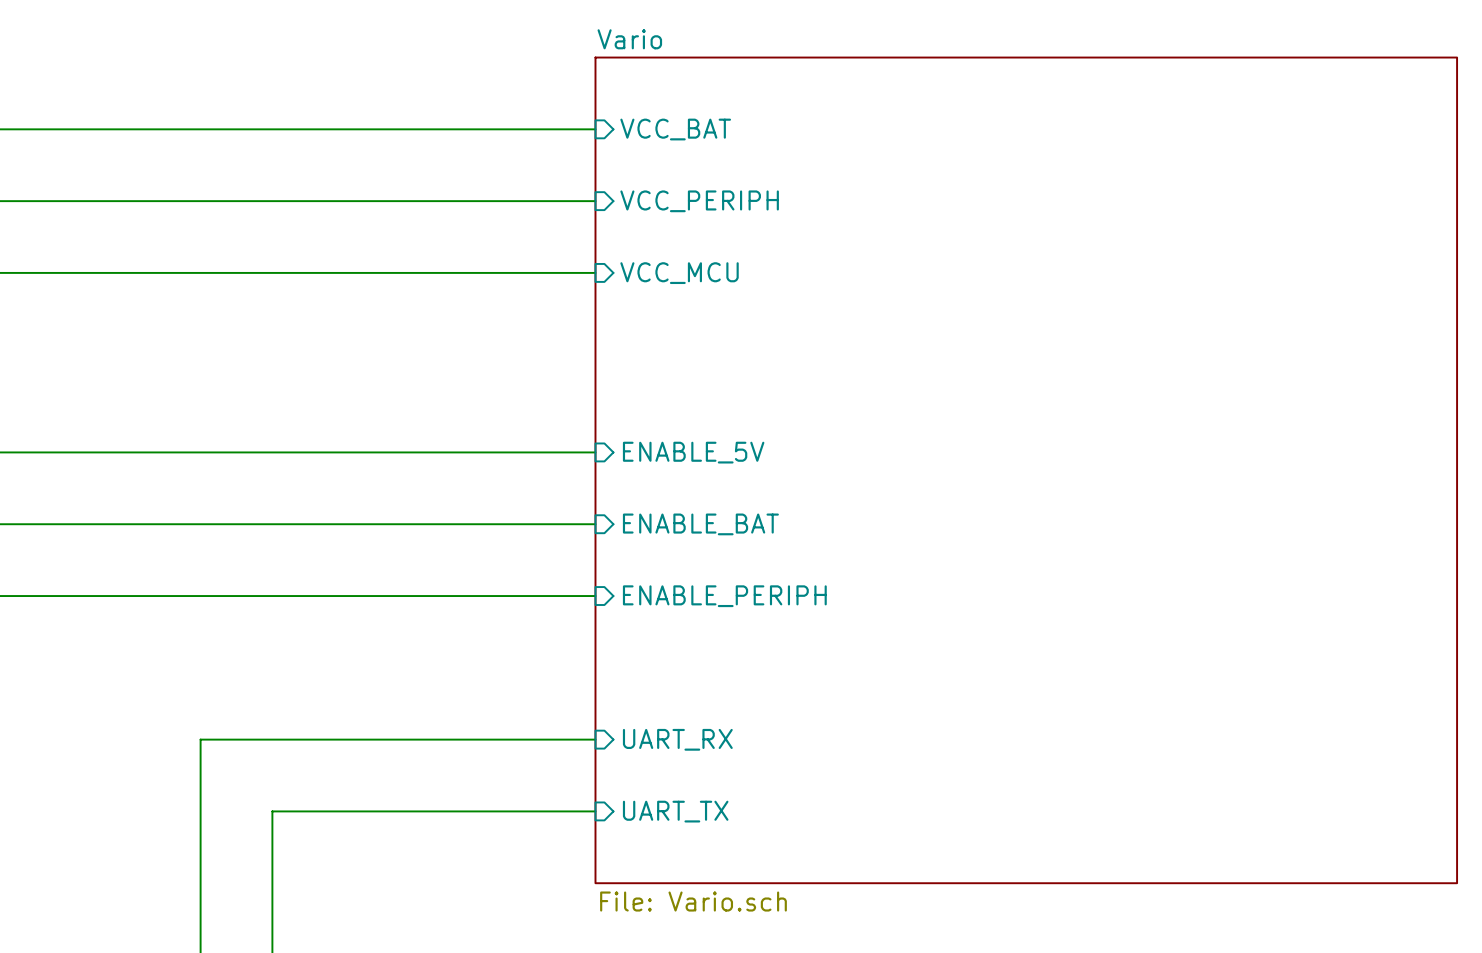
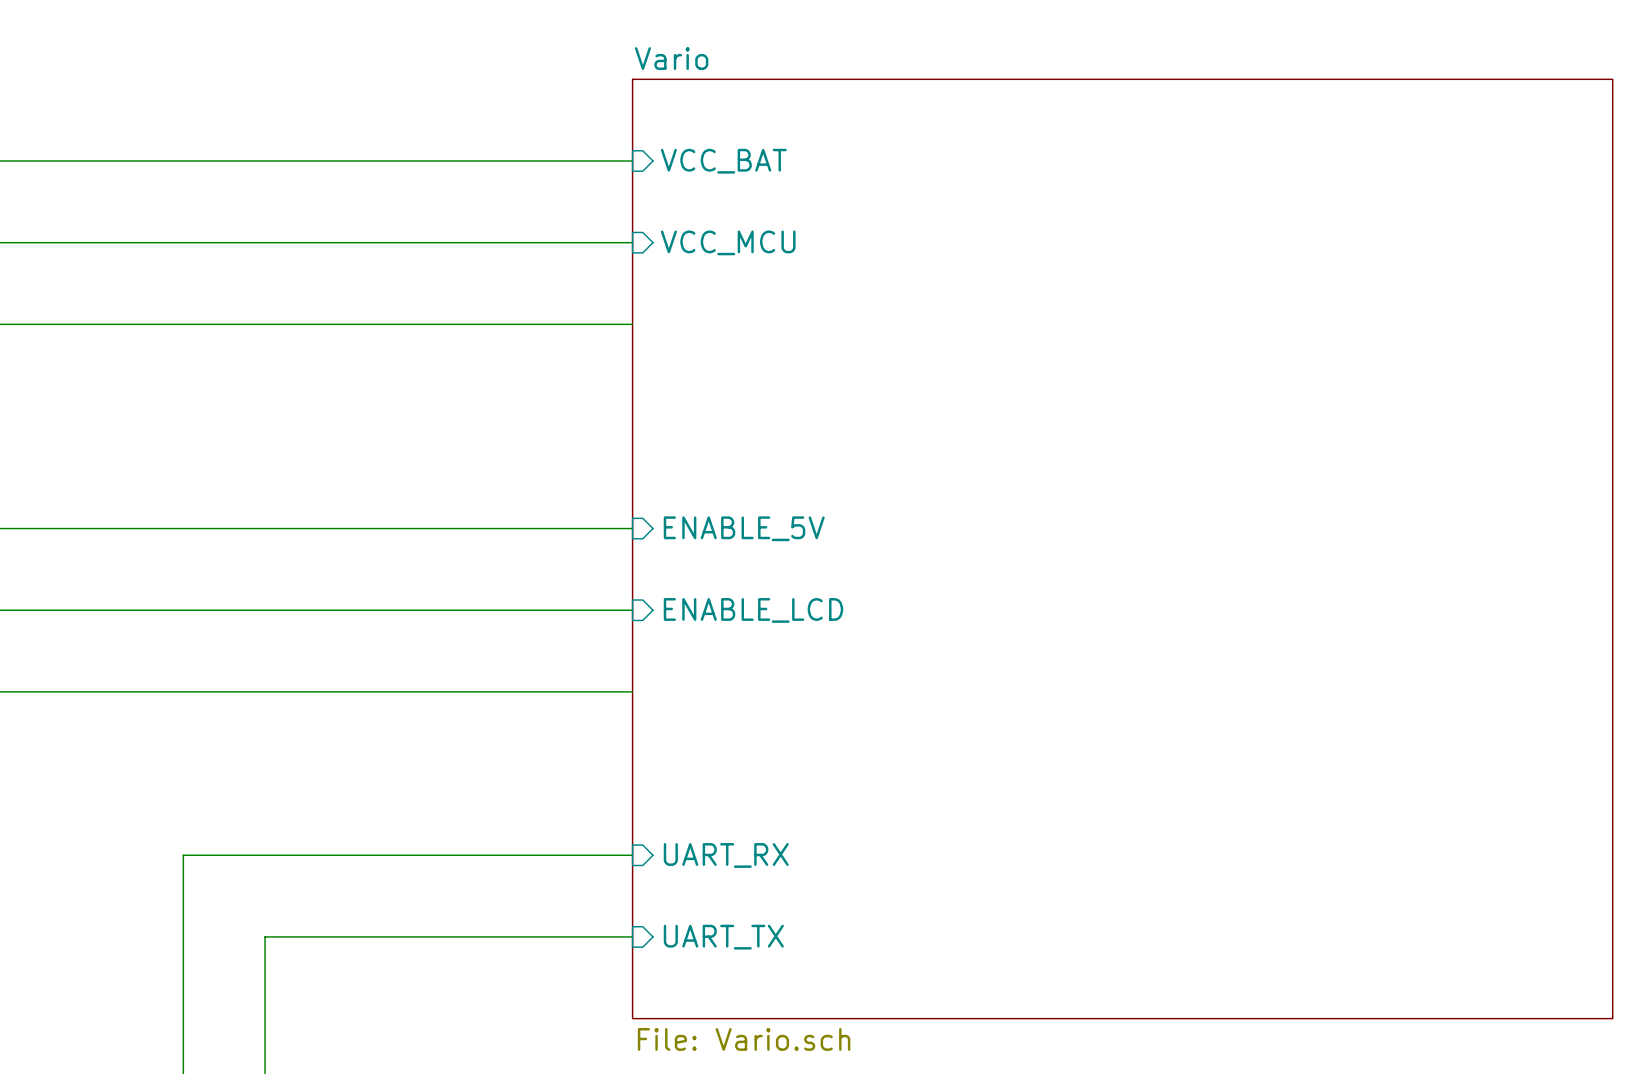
sheet pin: VCC_PERIPH (699, 201) -> VCC_MCU (728, 242)
sheet pin: VCC_MCU (679, 273) -> none
sheet pin: ENABLE_BAT (700, 524) -> ENABLE_LCD (753, 610)
sheet pin: ENABLE_PERIPH (724, 596) -> none

